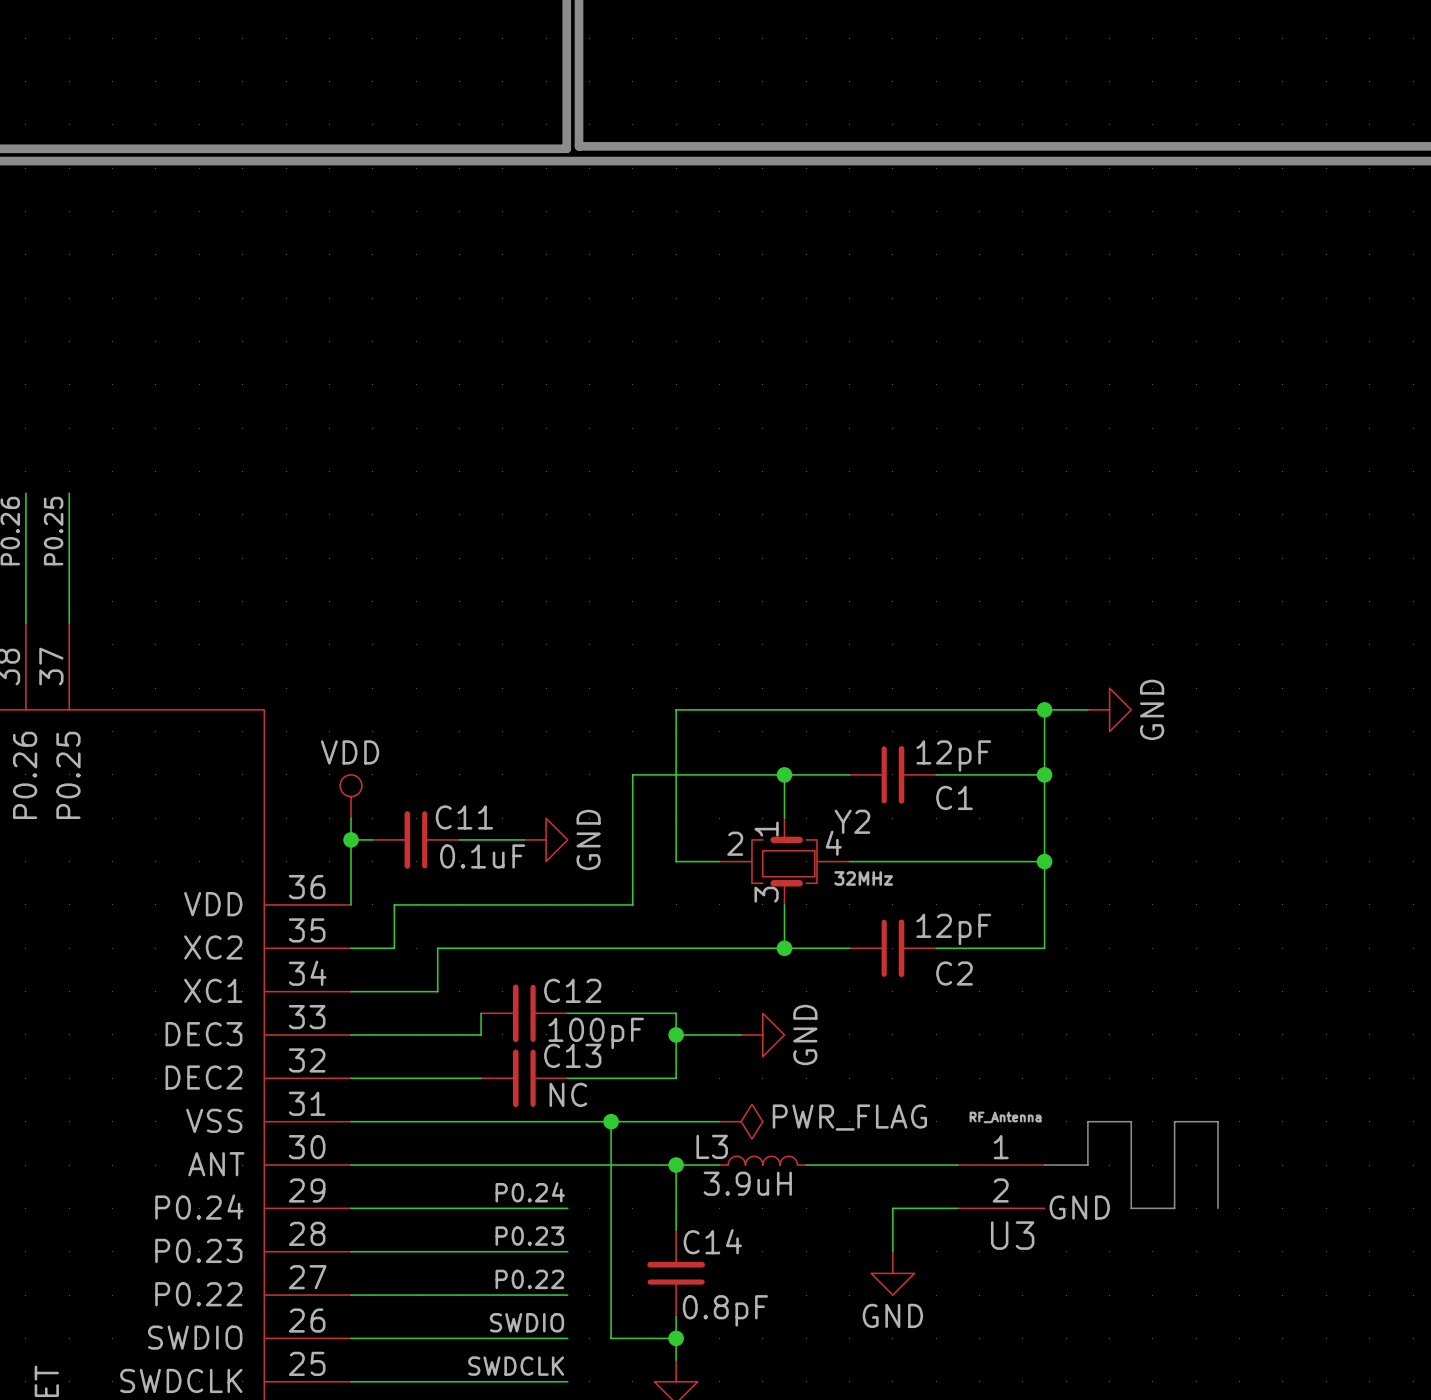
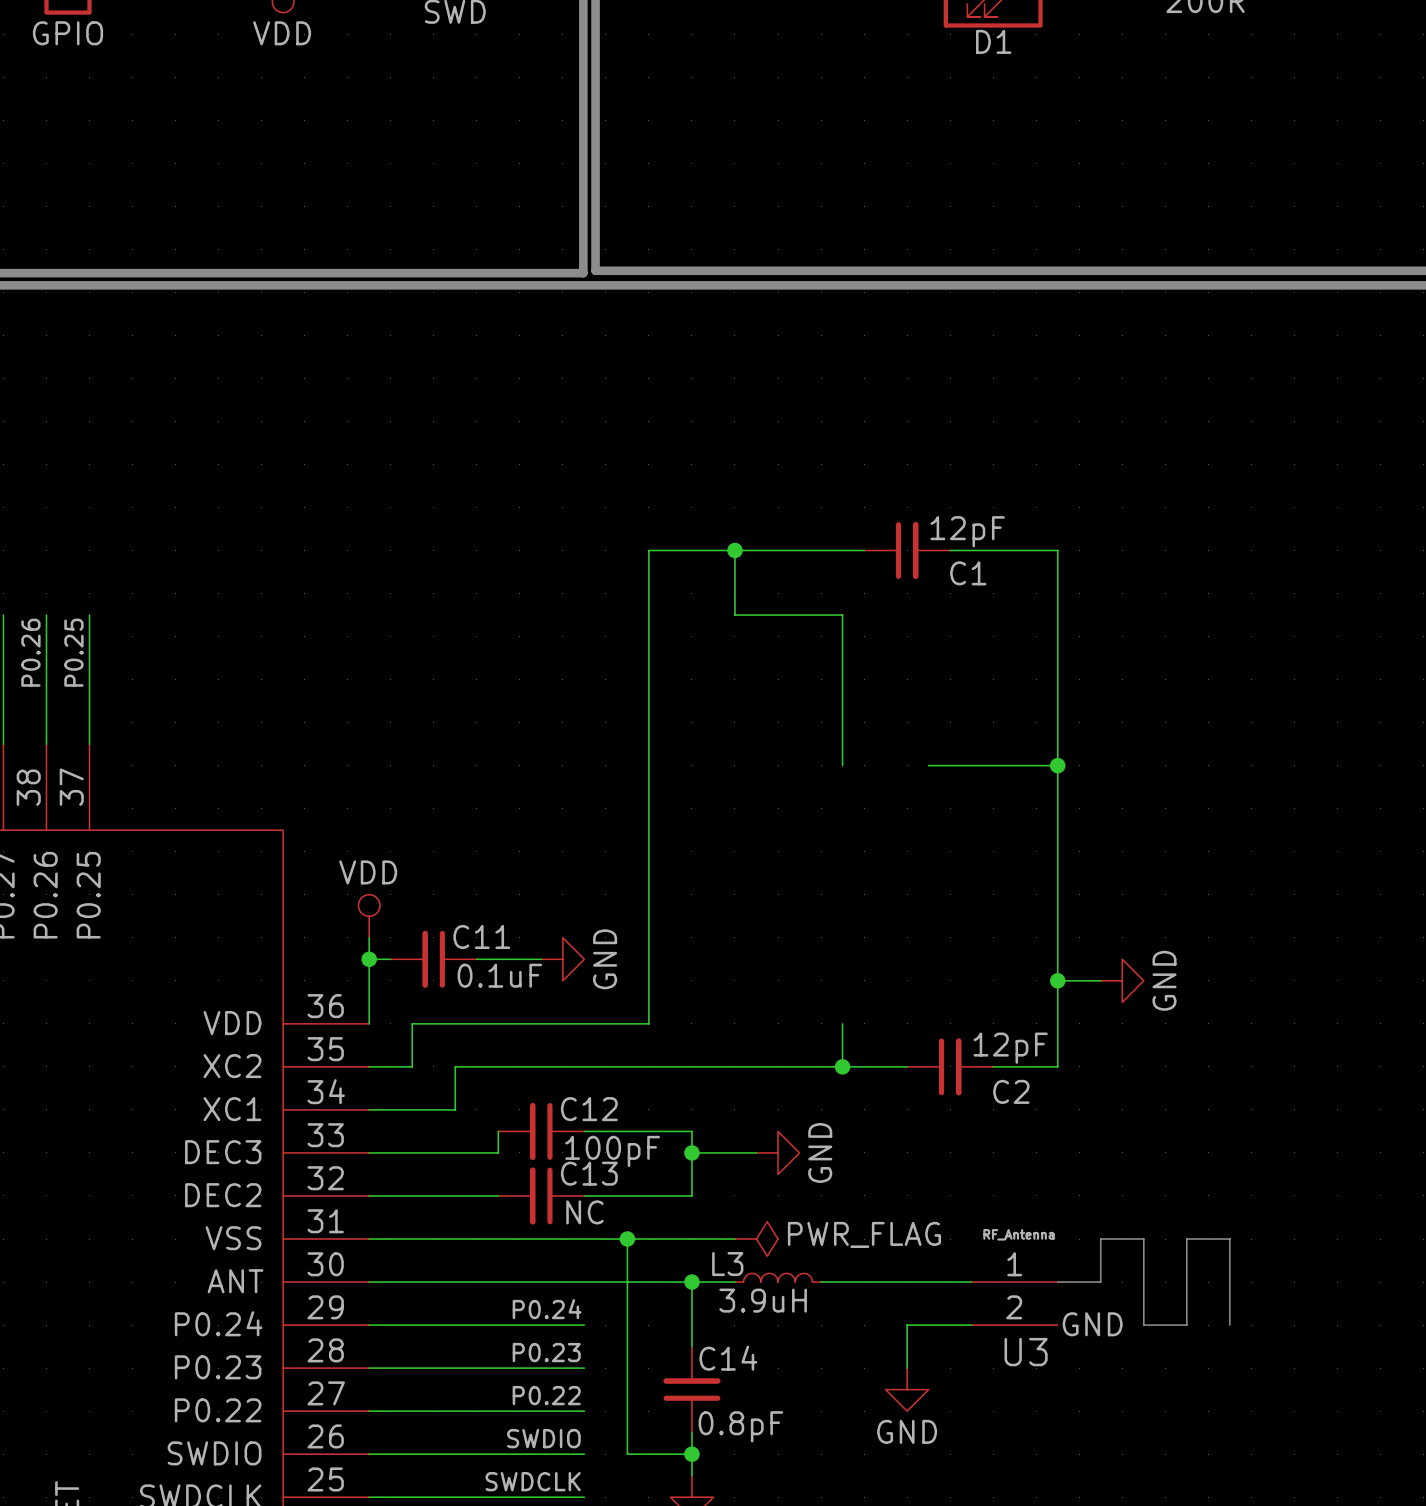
wire: none -> (734, 550) (734, 615) (842, 615) (842, 765)
junction: none -> (734, 550)
wire: none -> (950, 550) (1057, 550) (1057, 830)
wire: none -> (928, 765) (1057, 765)
junction: none -> (1057, 765)
junction: (1044, 709) -> none
wire: (1087, 709) (676, 709) (676, 861) (719, 861) -> none
power symbol position: GND (1109, 709) -> GND (1122, 980)
wire: (632, 774) (849, 774) -> (648, 894) (648, 550) (864, 550)
wire: (784, 774) (784, 818) -> none
junction: (784, 774) -> none
C1 position: (892, 774) -> (907, 550)
wire: (936, 774) (1044, 774) -> none
junction: (1044, 774) -> none
Y2: 32MHz (784, 861) -> none
wire: (849, 861) (1044, 861) -> (1100, 980) (1057, 980)
wire: (784, 904) (784, 948) -> (842, 1023) (842, 1066)
junction position: (784, 948) -> (842, 1066)
C2 position: (892, 948) -> (950, 1066)

